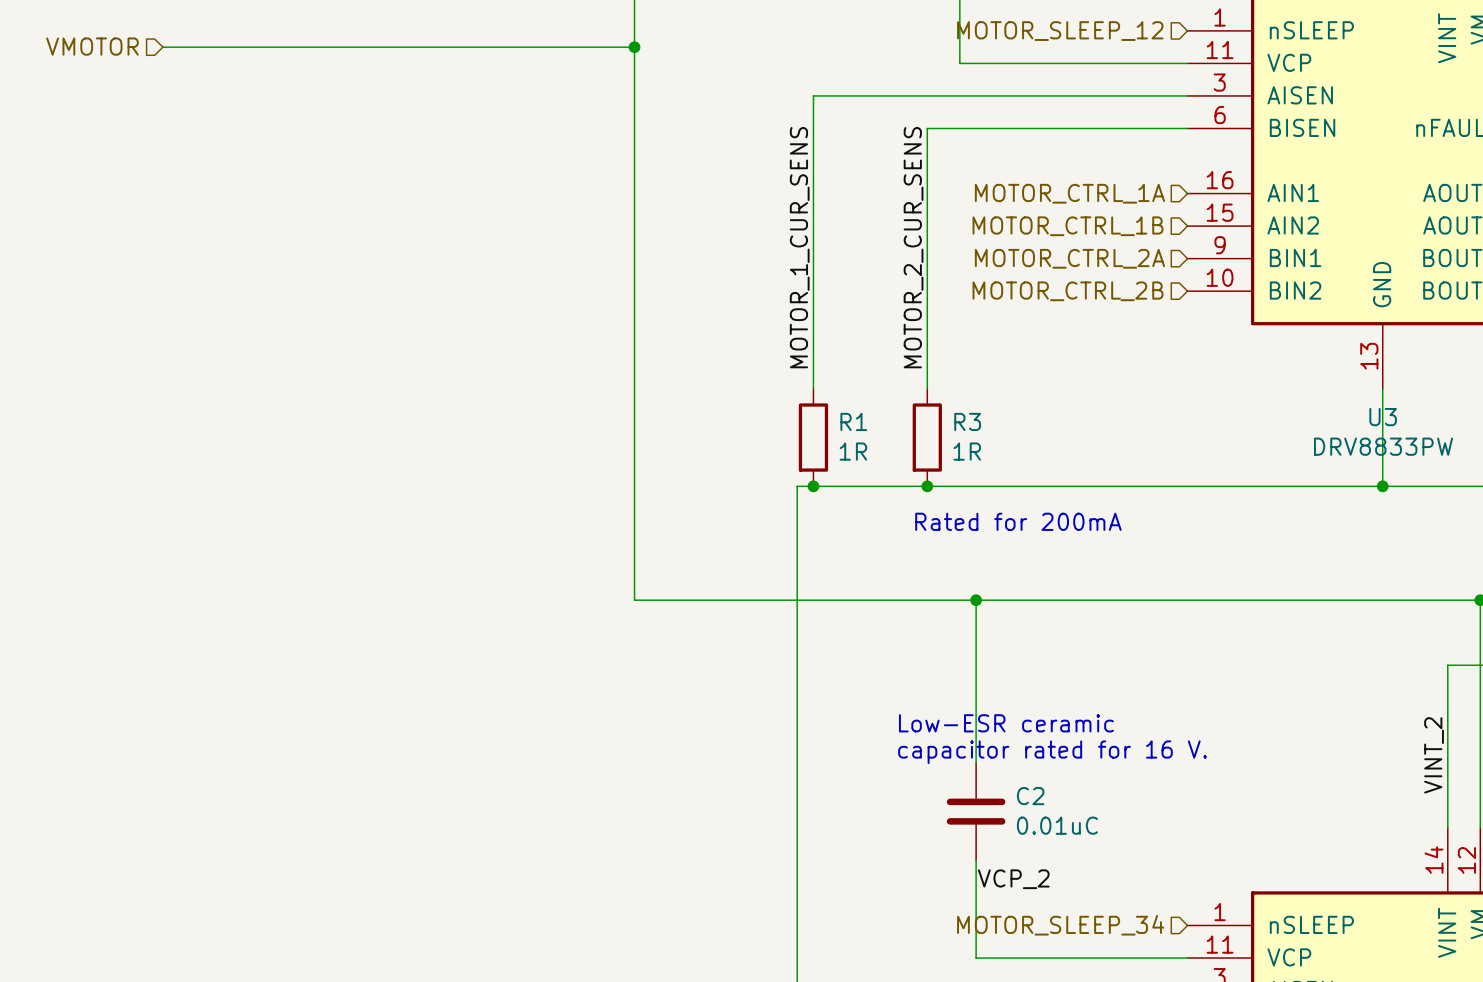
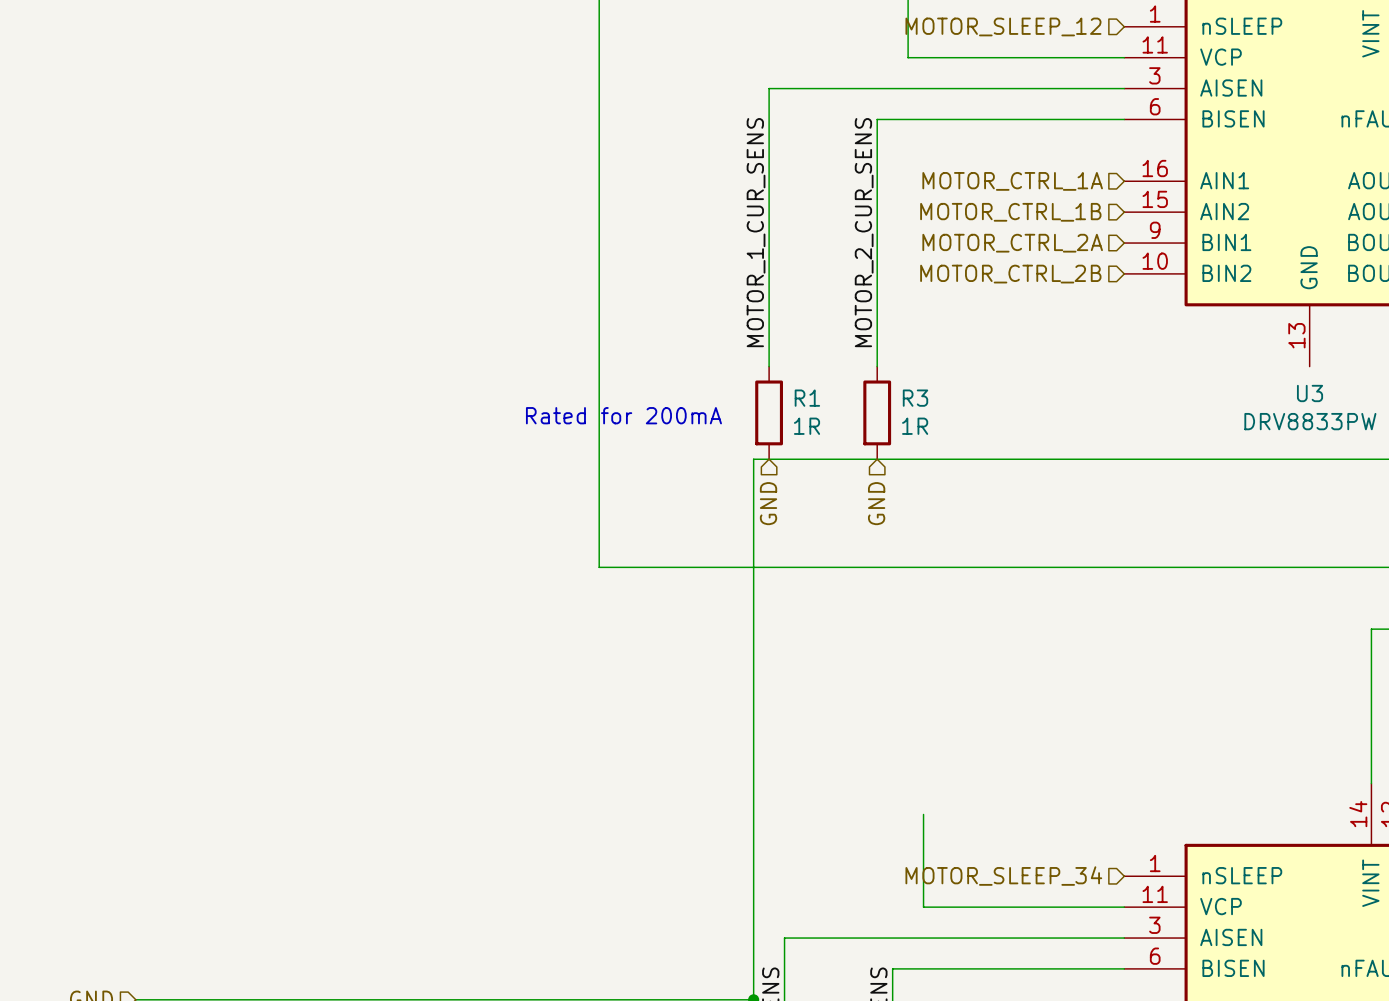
hierarchical label: VMOTOR (92, 46) -> none
wire: (162, 47) (634, 47) -> none
junction: (634, 47) -> none
wire: (1382, 388) (1382, 486) -> none
text: none -> Rated for 200mA (623, 415)
junction: (813, 486) -> none
junction: (927, 486) -> none
junction: (1382, 486) -> none
text: Rated for 200mA (1018, 521) -> none
hierarchical label: none -> GND (768, 503)
hierarchical label: none -> GND (876, 503)
wire: (976, 600) (976, 762) -> none
junction: (976, 600) -> none
text: Low-ESR ceramic (1006, 723) -> none
text: capacitor rated for 16 V. (1052, 752) -> none
label: VINT_2 (1434, 755) -> none
C2: 0.01uC (976, 811) -> none
label: VCP_2 (1013, 879) -> none

